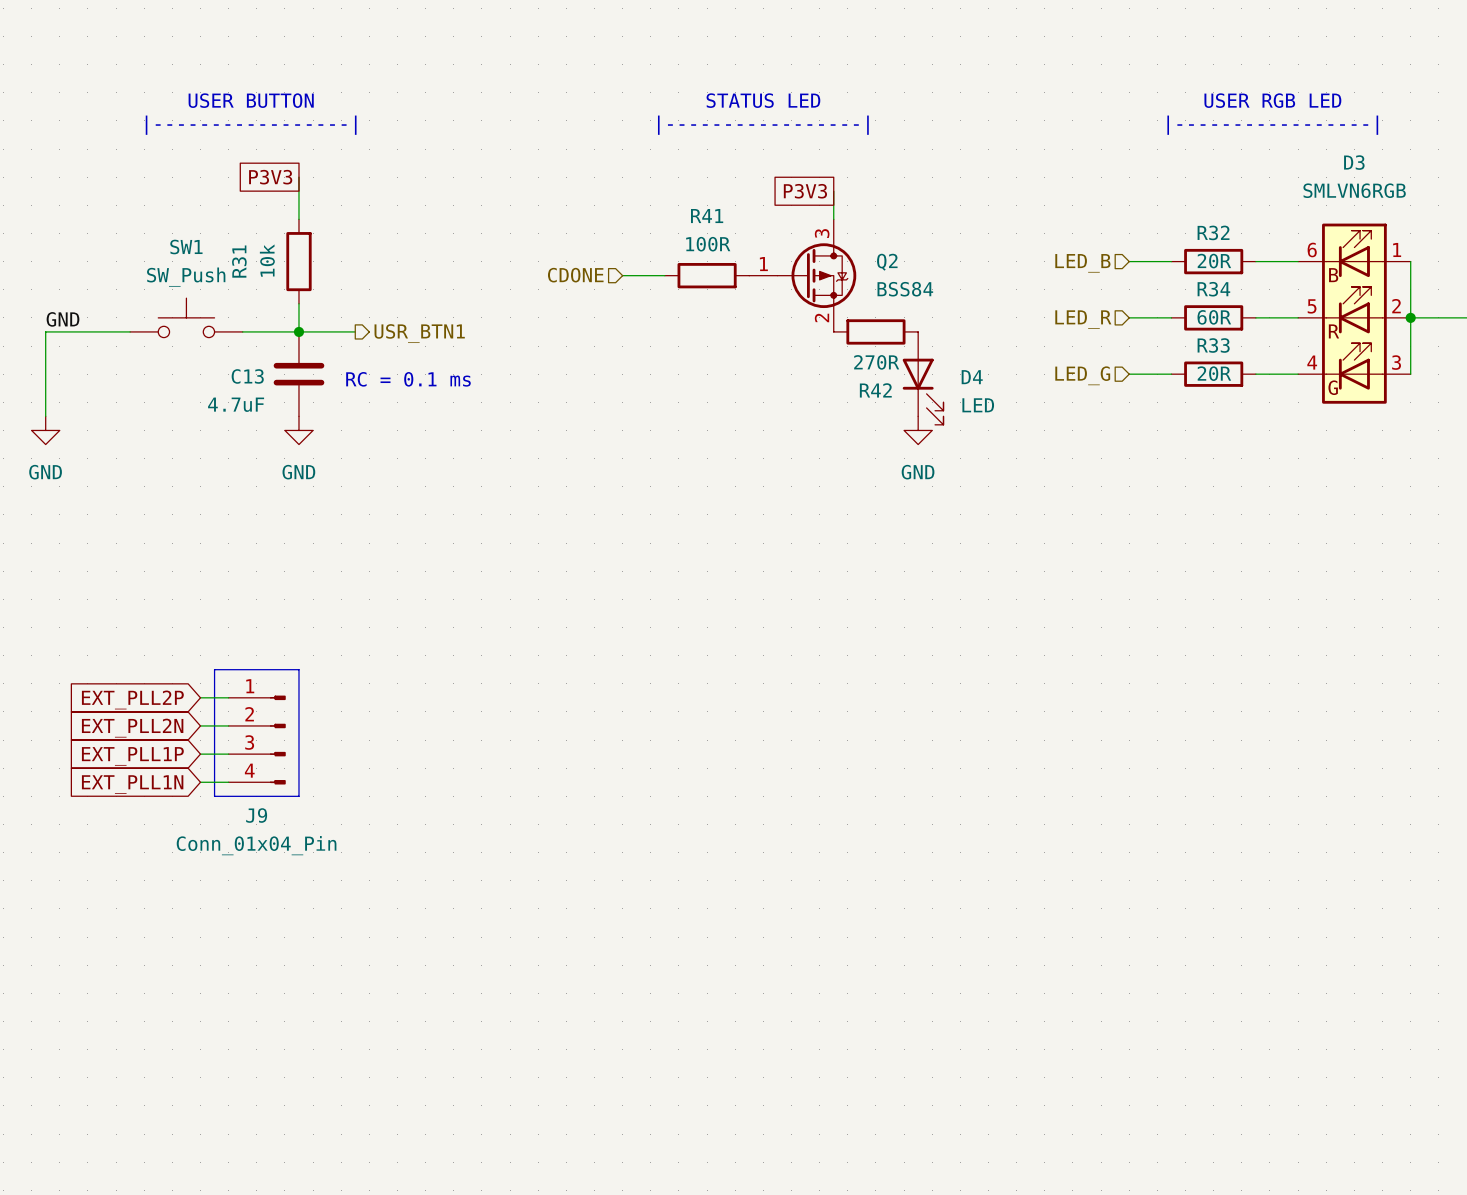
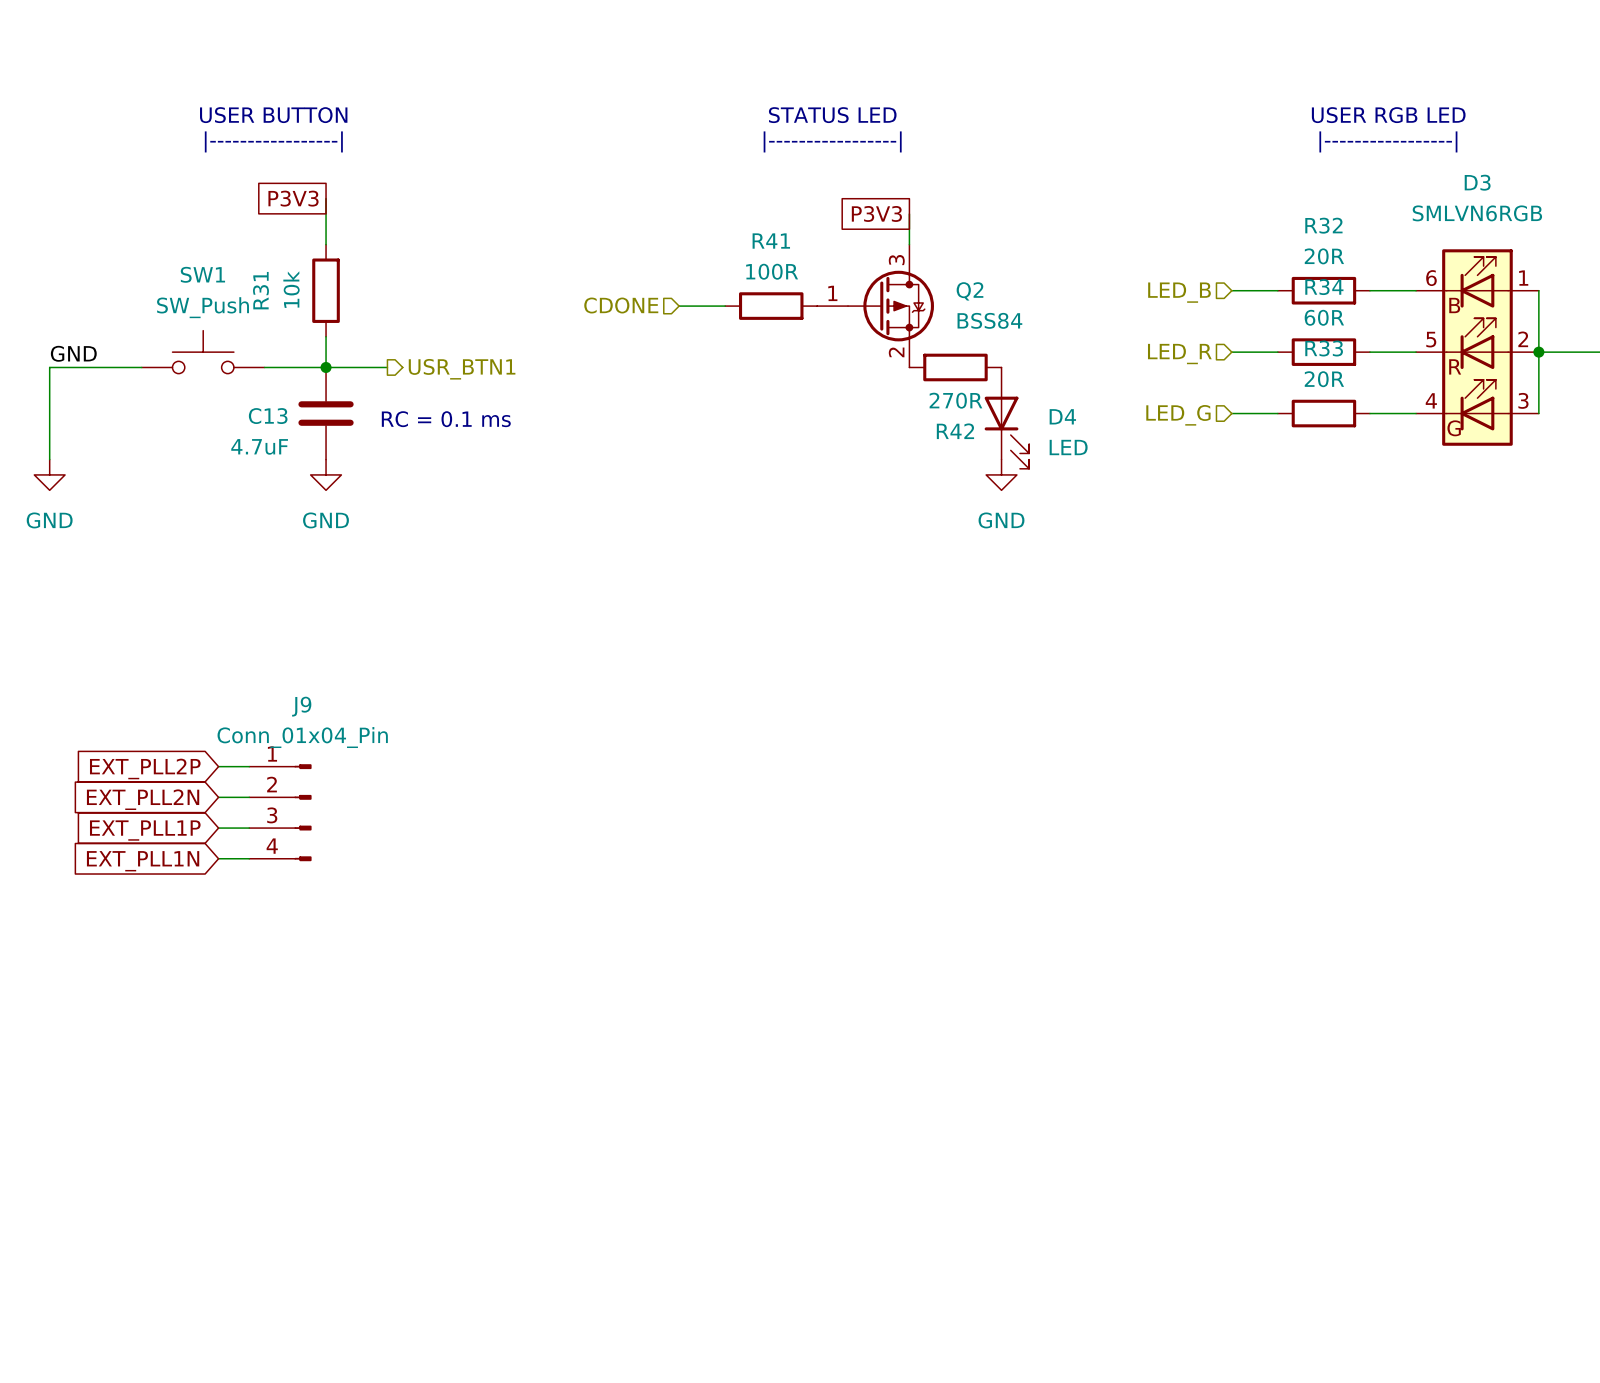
R32 name position: R32 (1213, 232) -> R32 (1323, 225)
R32 value position: 20R (1214, 261) -> 20R (1324, 256)
R34 name position: R34 (1213, 289) -> R34 (1324, 287)
R34 value position: 60R (1214, 317) -> 60R (1324, 317)
R33 name position: R33 (1213, 345) -> R33 (1324, 348)
R33 value position: 20R (1214, 373) -> 20R (1324, 379)
line: (214, 669) (298, 669) (298, 796) (214, 796) (214, 669) -> none
J9 name position: J9 (256, 815) -> J9 (301, 706)
J9 value position: Conn_01x04_Pin (256, 845) -> Conn_01x04_Pin (302, 737)

